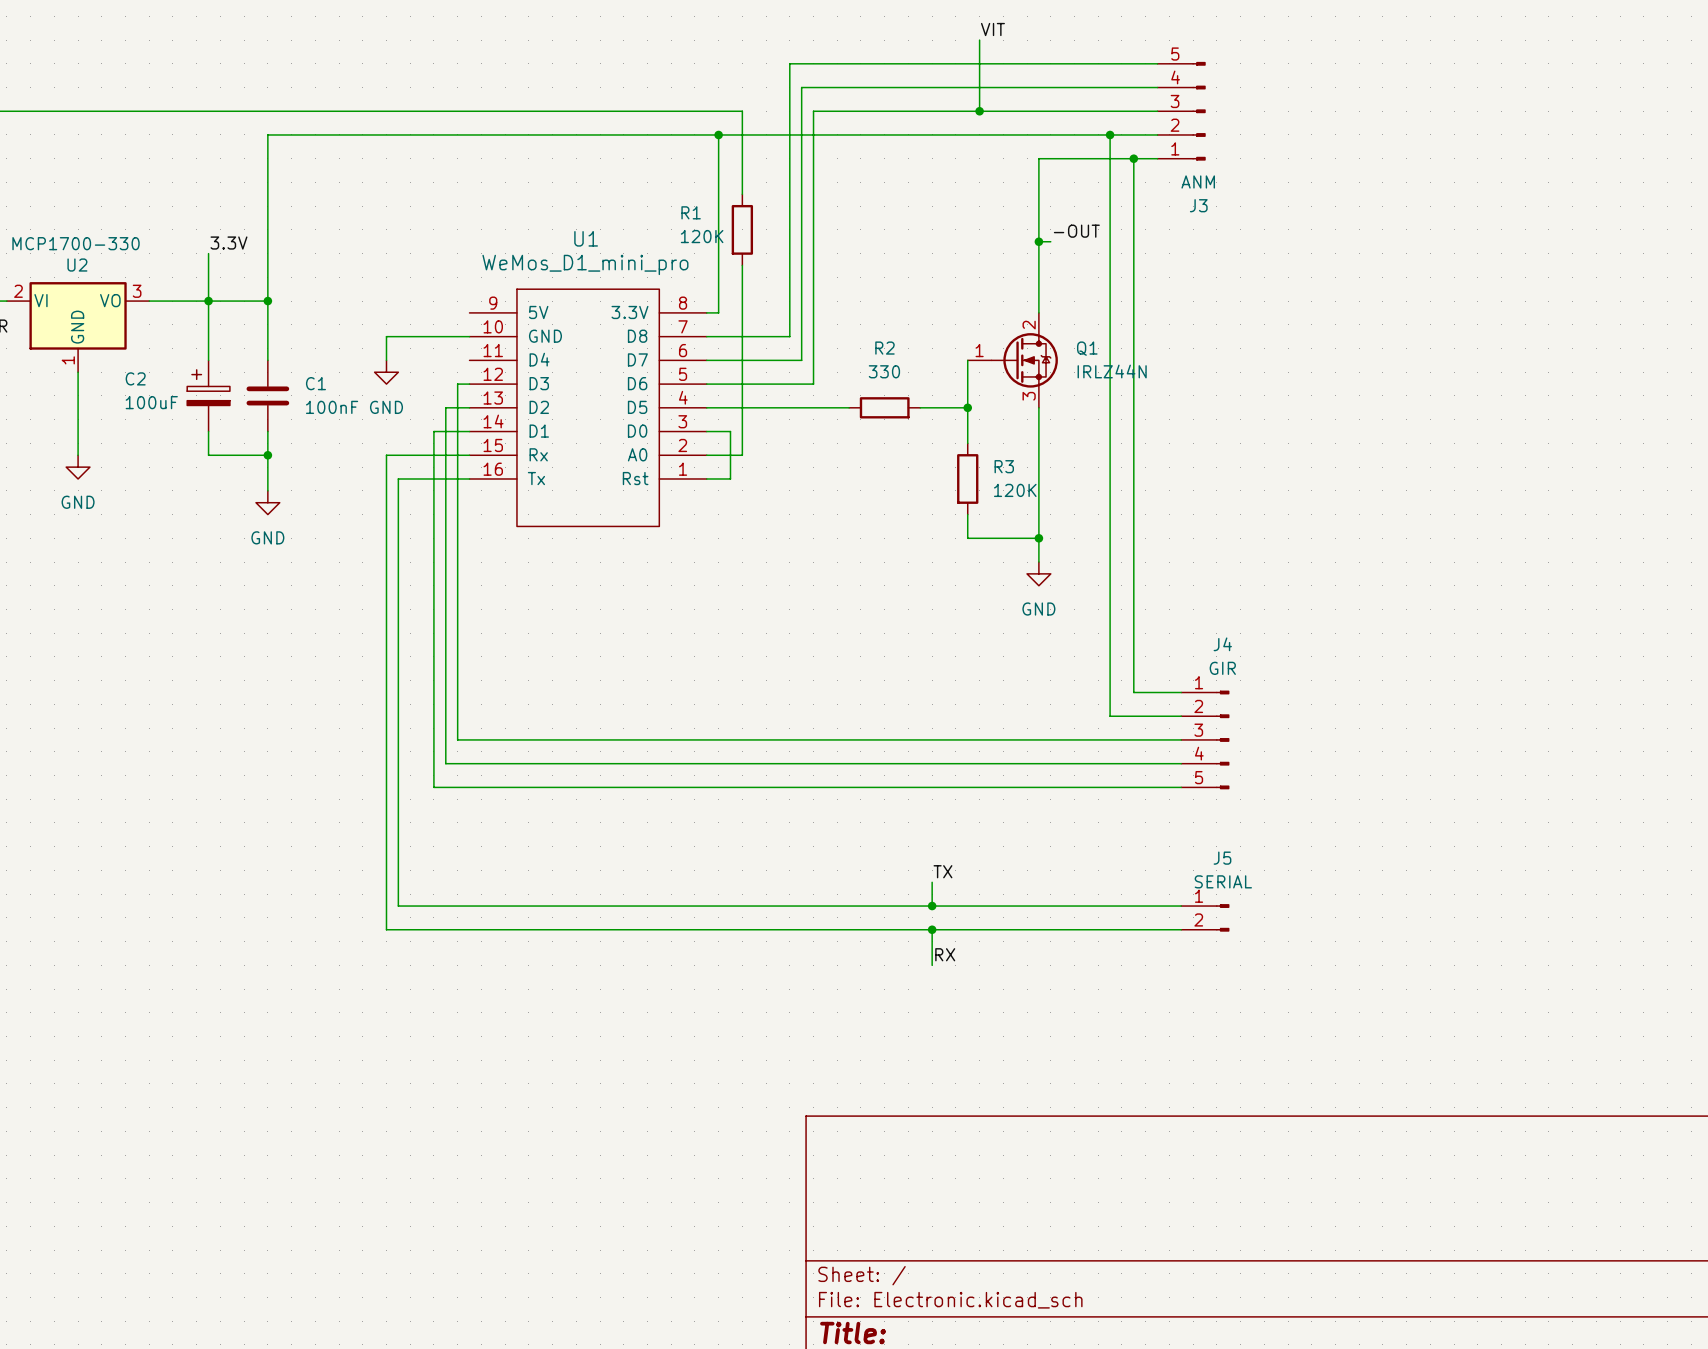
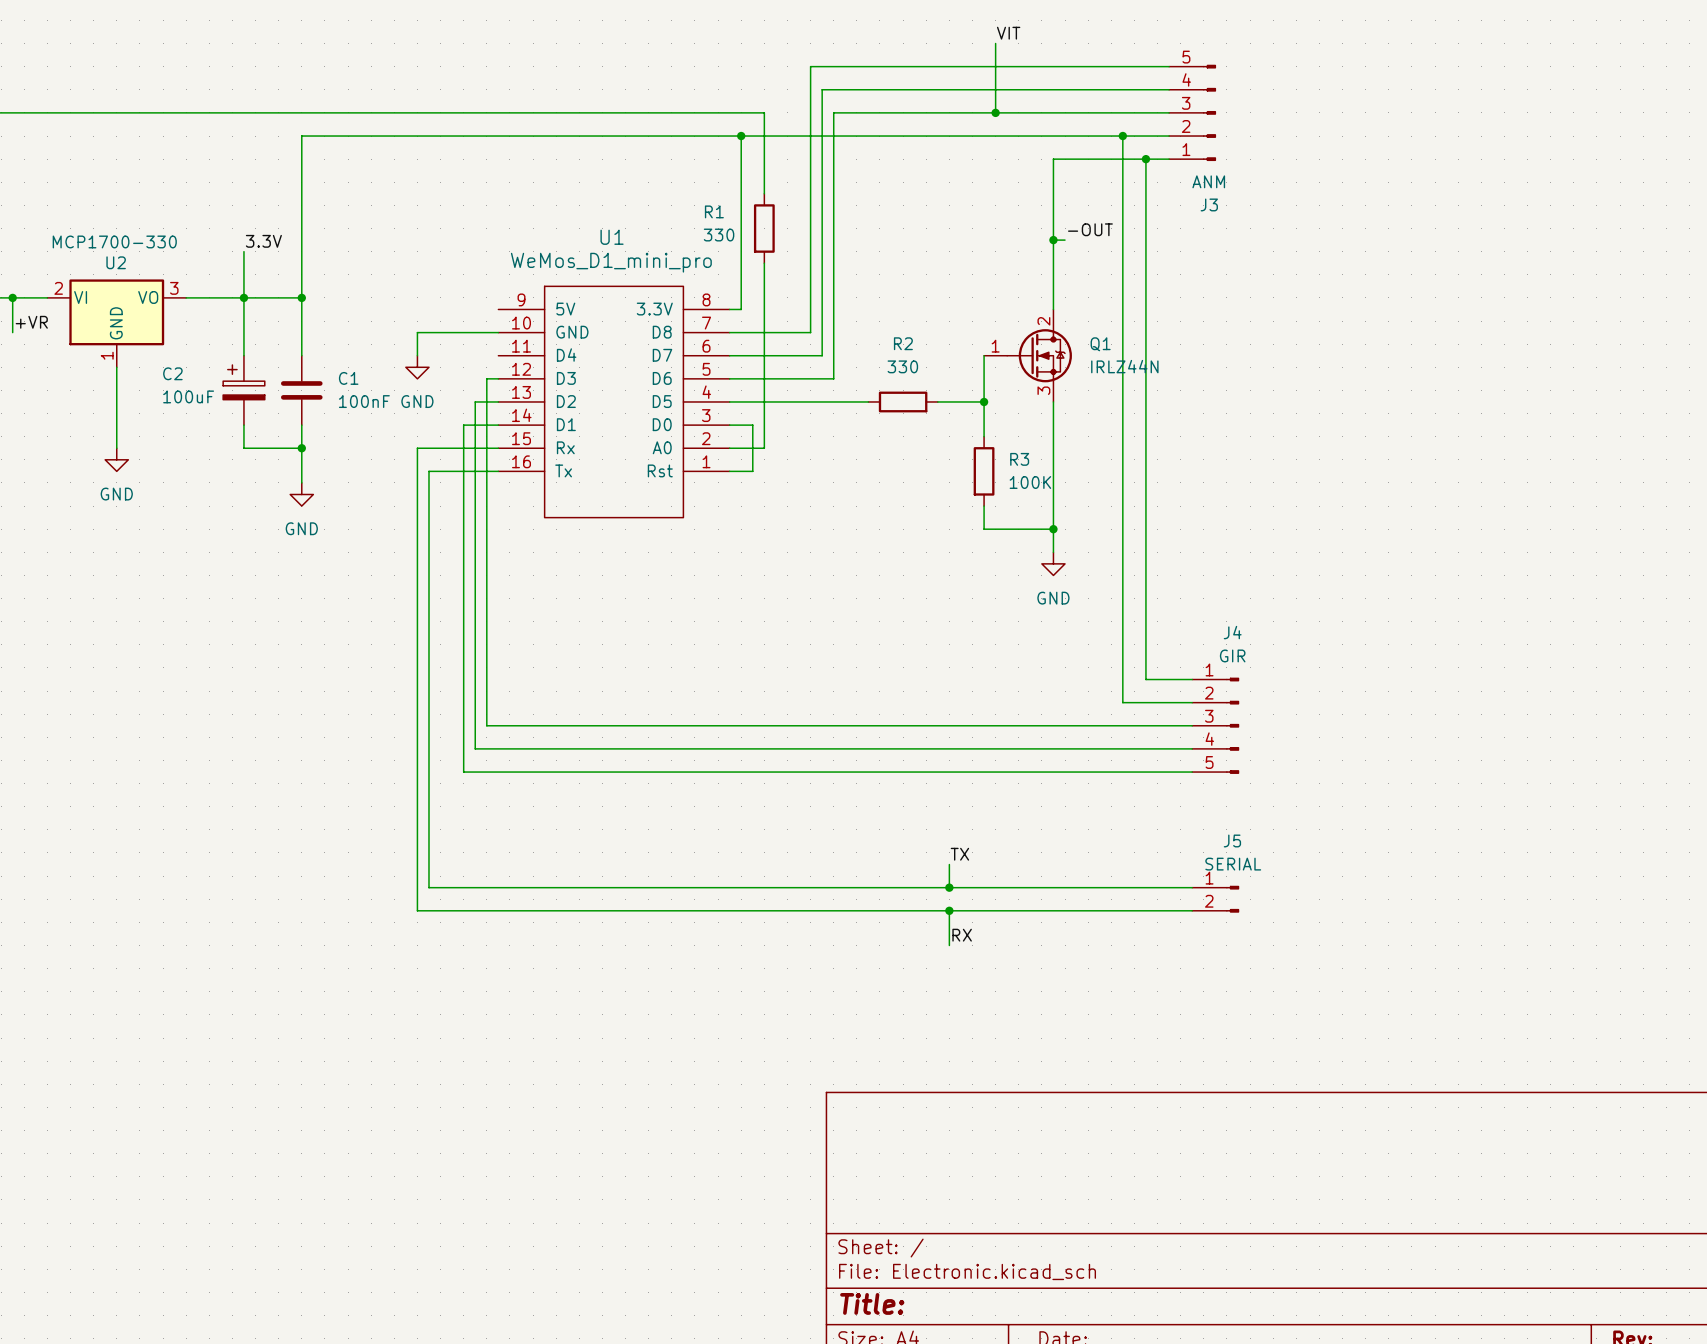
R1 value: 120K (702, 236) -> 330 (719, 235)
R3 value: 120K (1015, 490) -> 100K (1030, 482)

